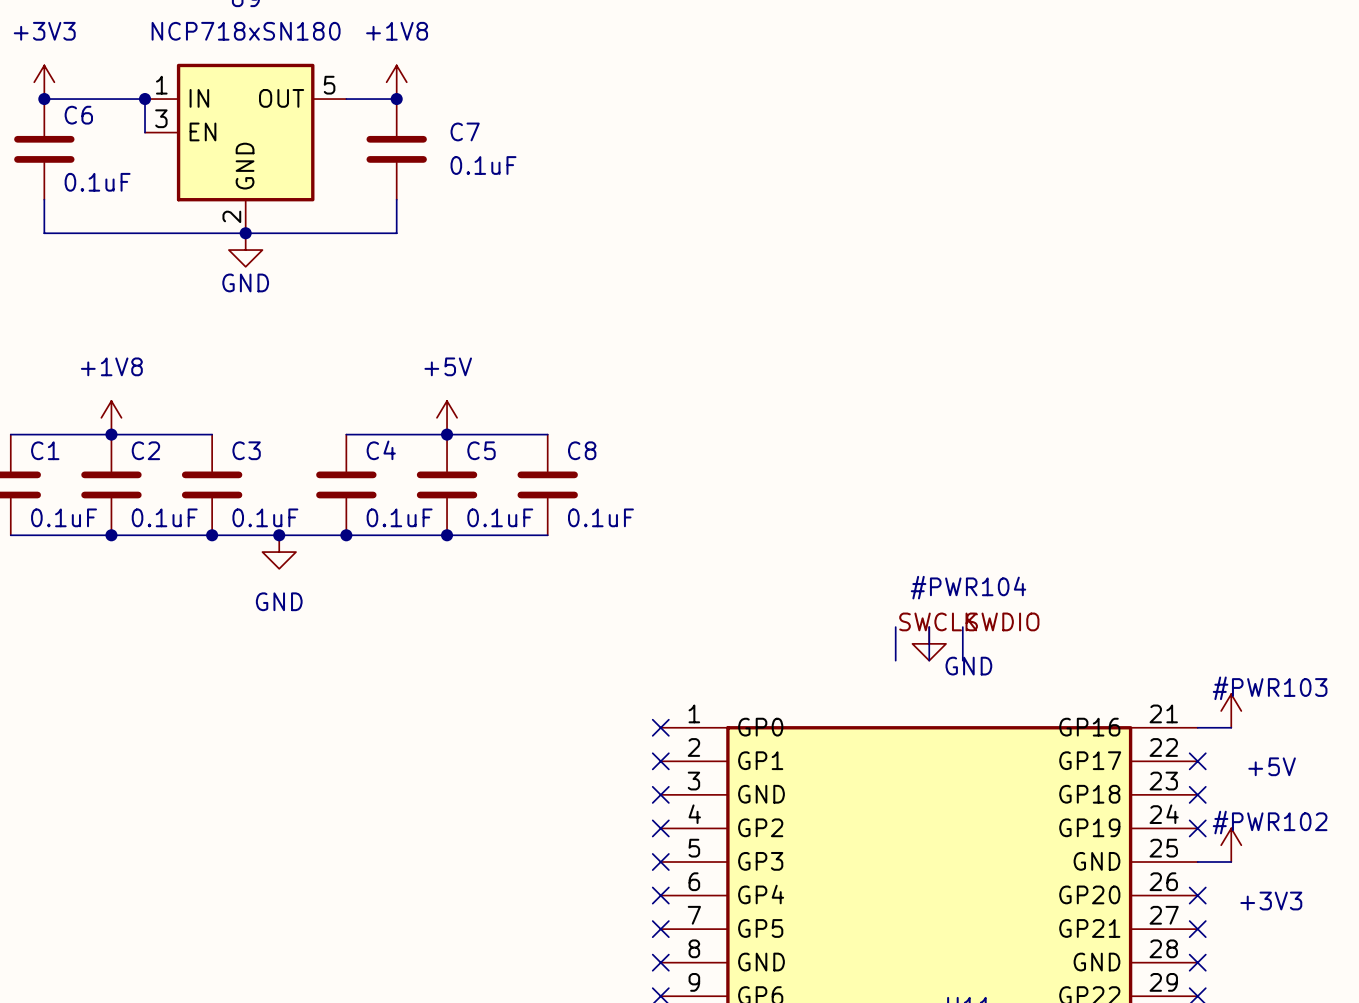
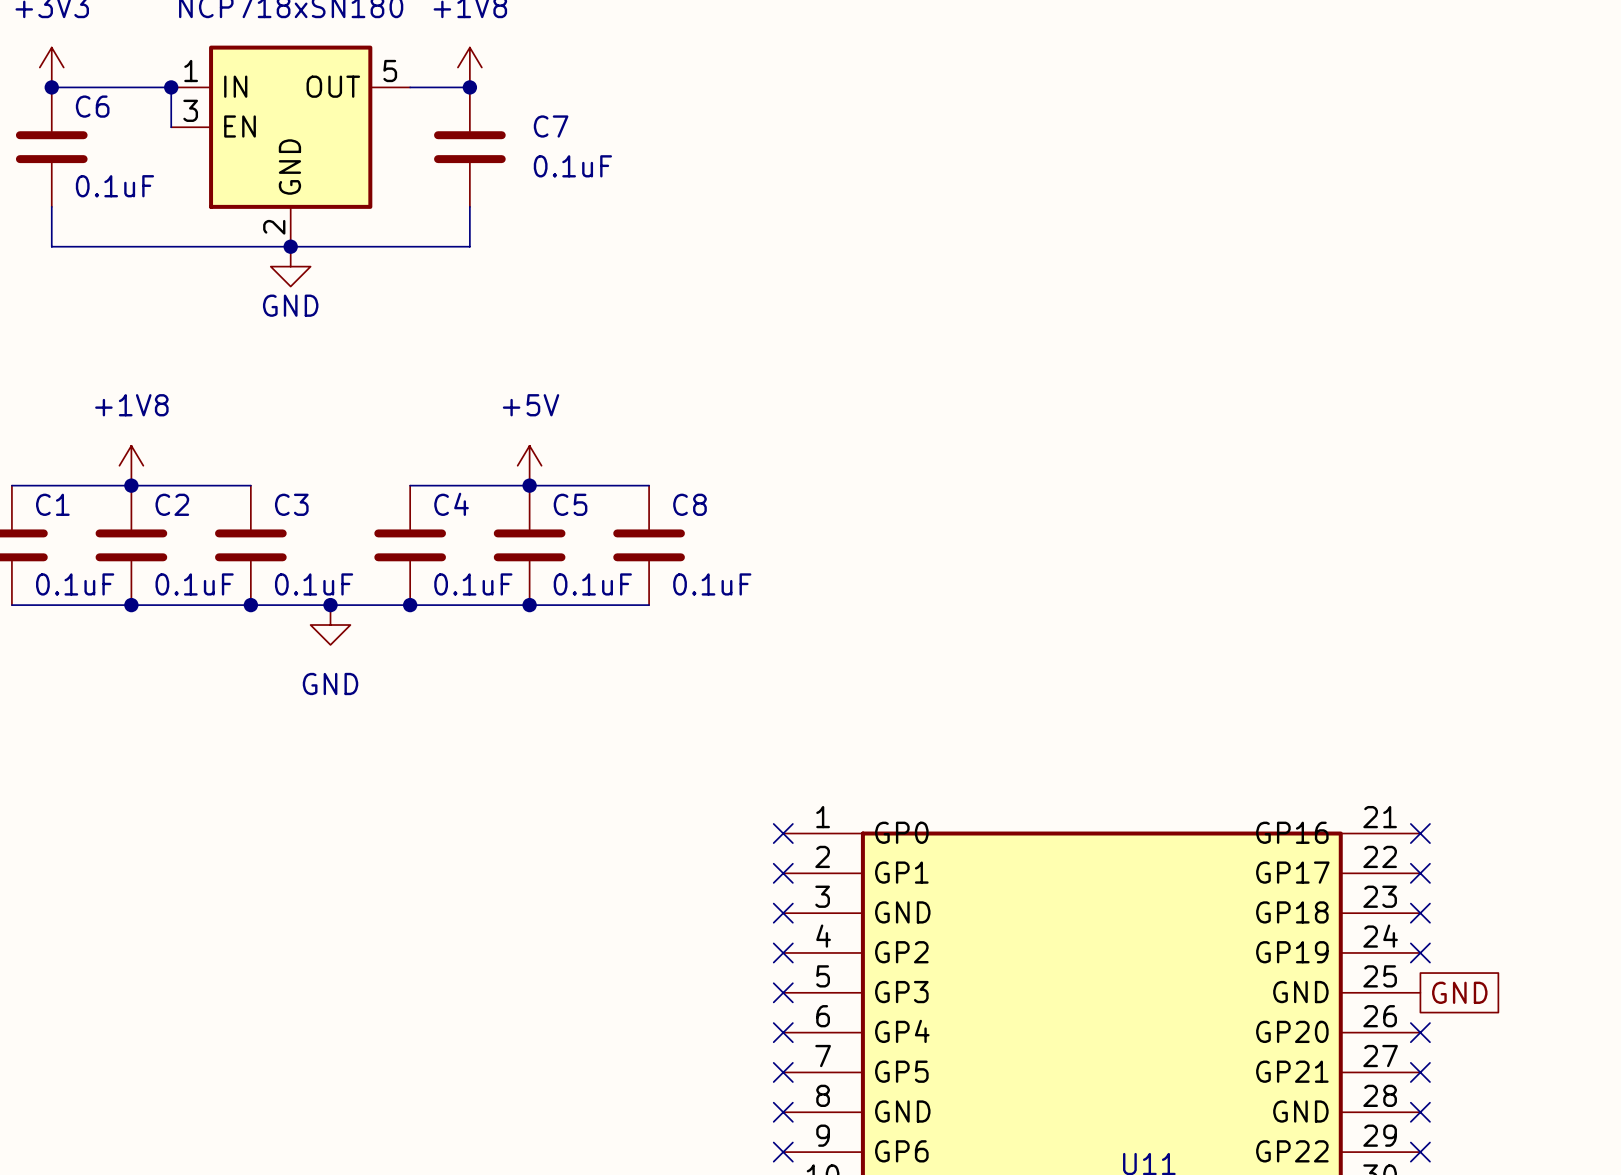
label: SWCLK (938, 621) -> none
label: SWDIO (1002, 621) -> none
wire: (895, 627) (895, 660) -> none
wire: (929, 627) (929, 660) -> none
wire: (962, 627) (962, 660) -> none
#PWR104: GND (929, 643) -> none
#PWR103: +5V (1231, 710) -> none
wire: (1197, 727) (1231, 727) -> none
no-connect mark: none -> (1420, 833)
#PWR102: +3V3 (1231, 845) -> none
wire: (1197, 862) (1231, 862) -> none
global label: none -> GND (1459, 992)

